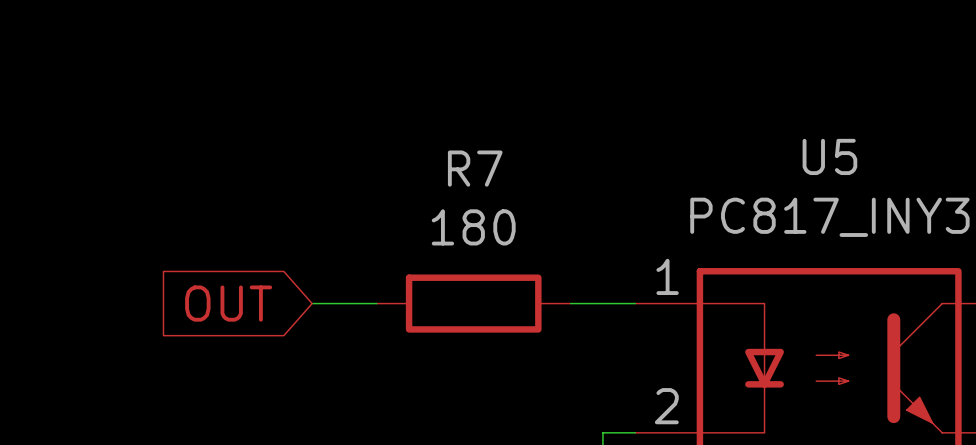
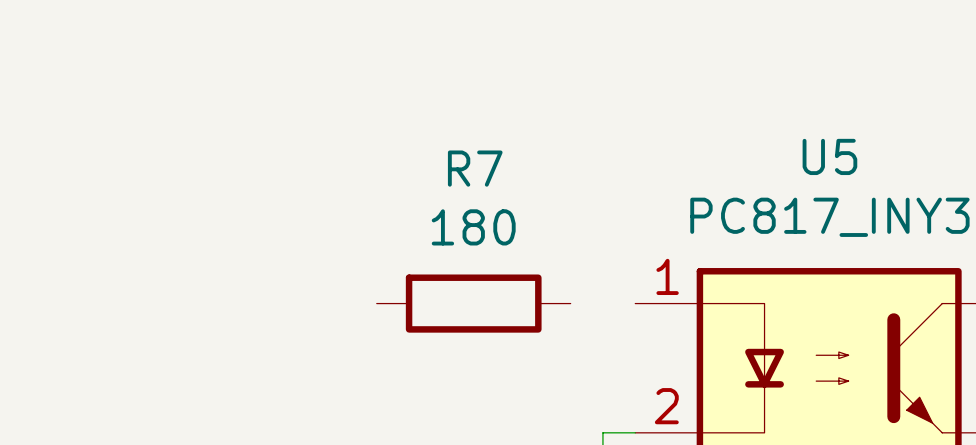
global label: OUT (228, 303) -> none
wire: (312, 303) (376, 303) -> none
wire: (570, 303) (635, 303) -> none

